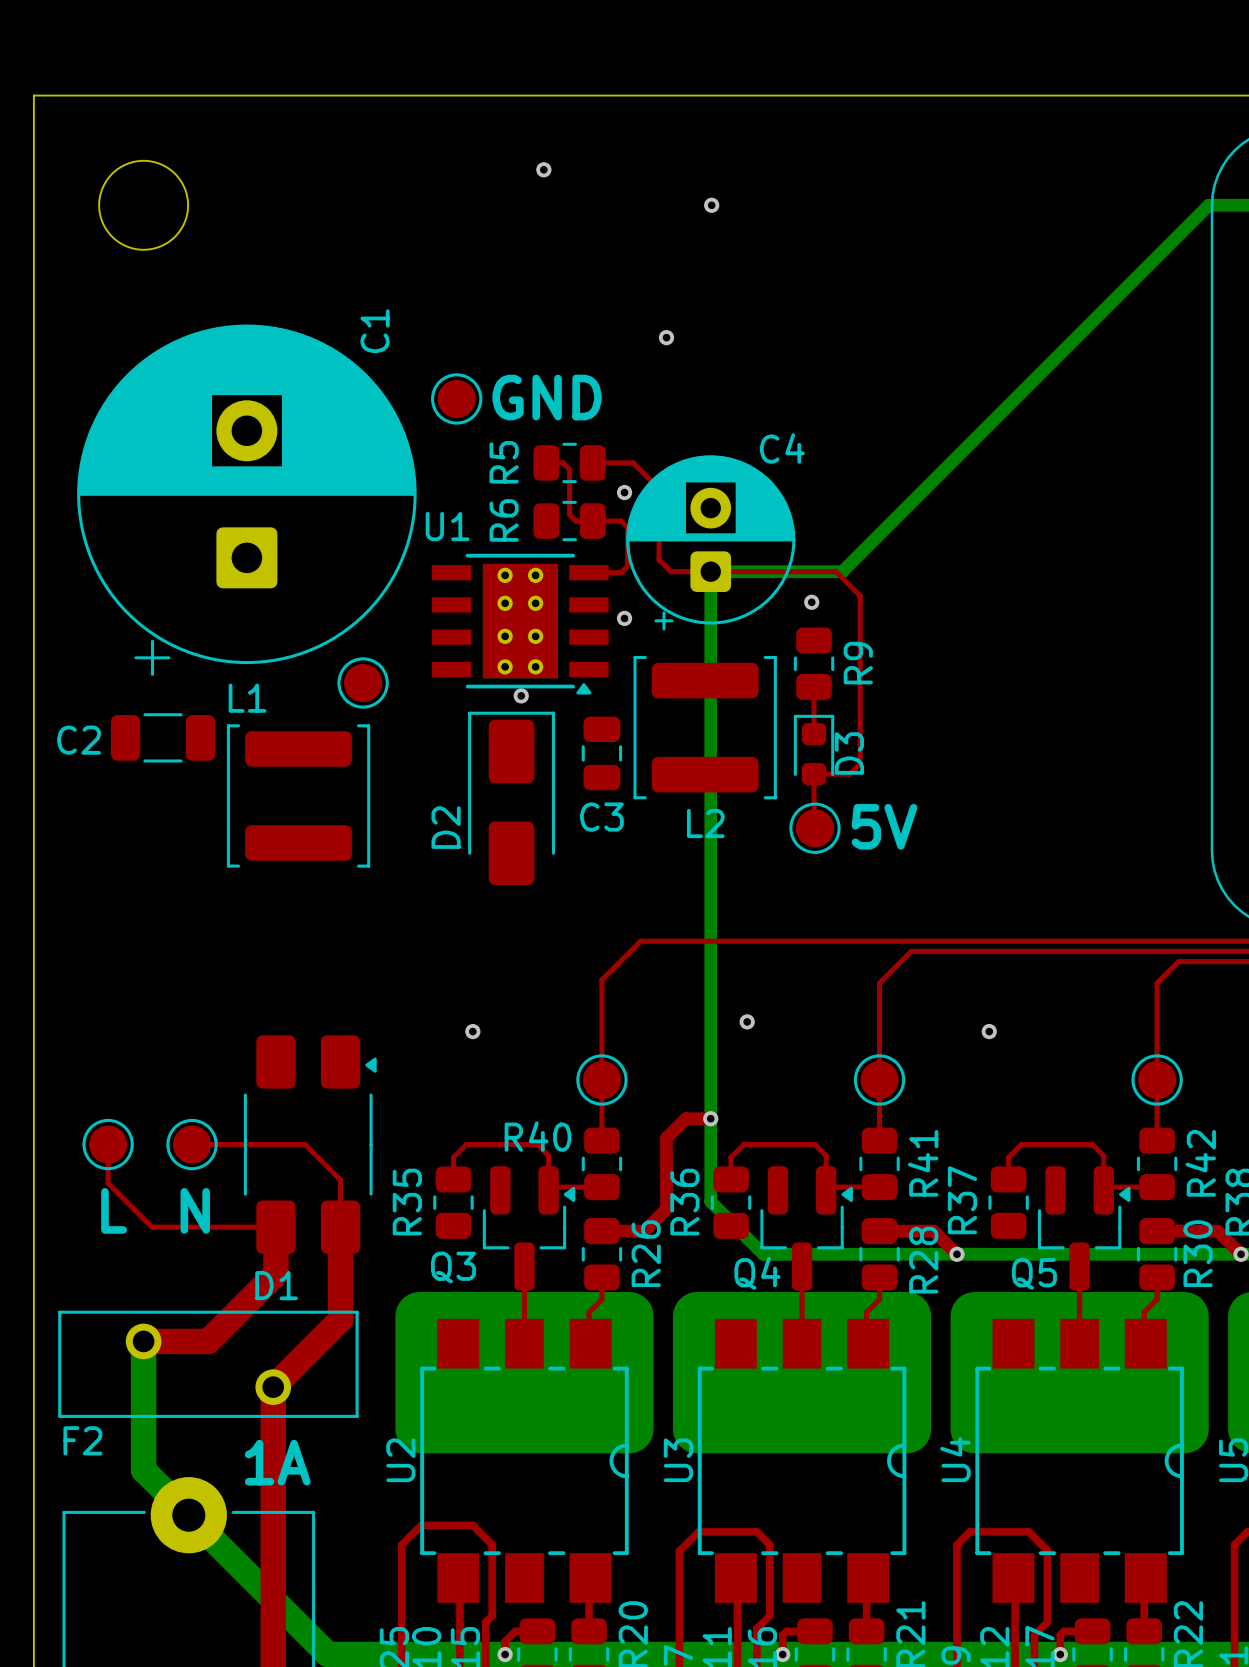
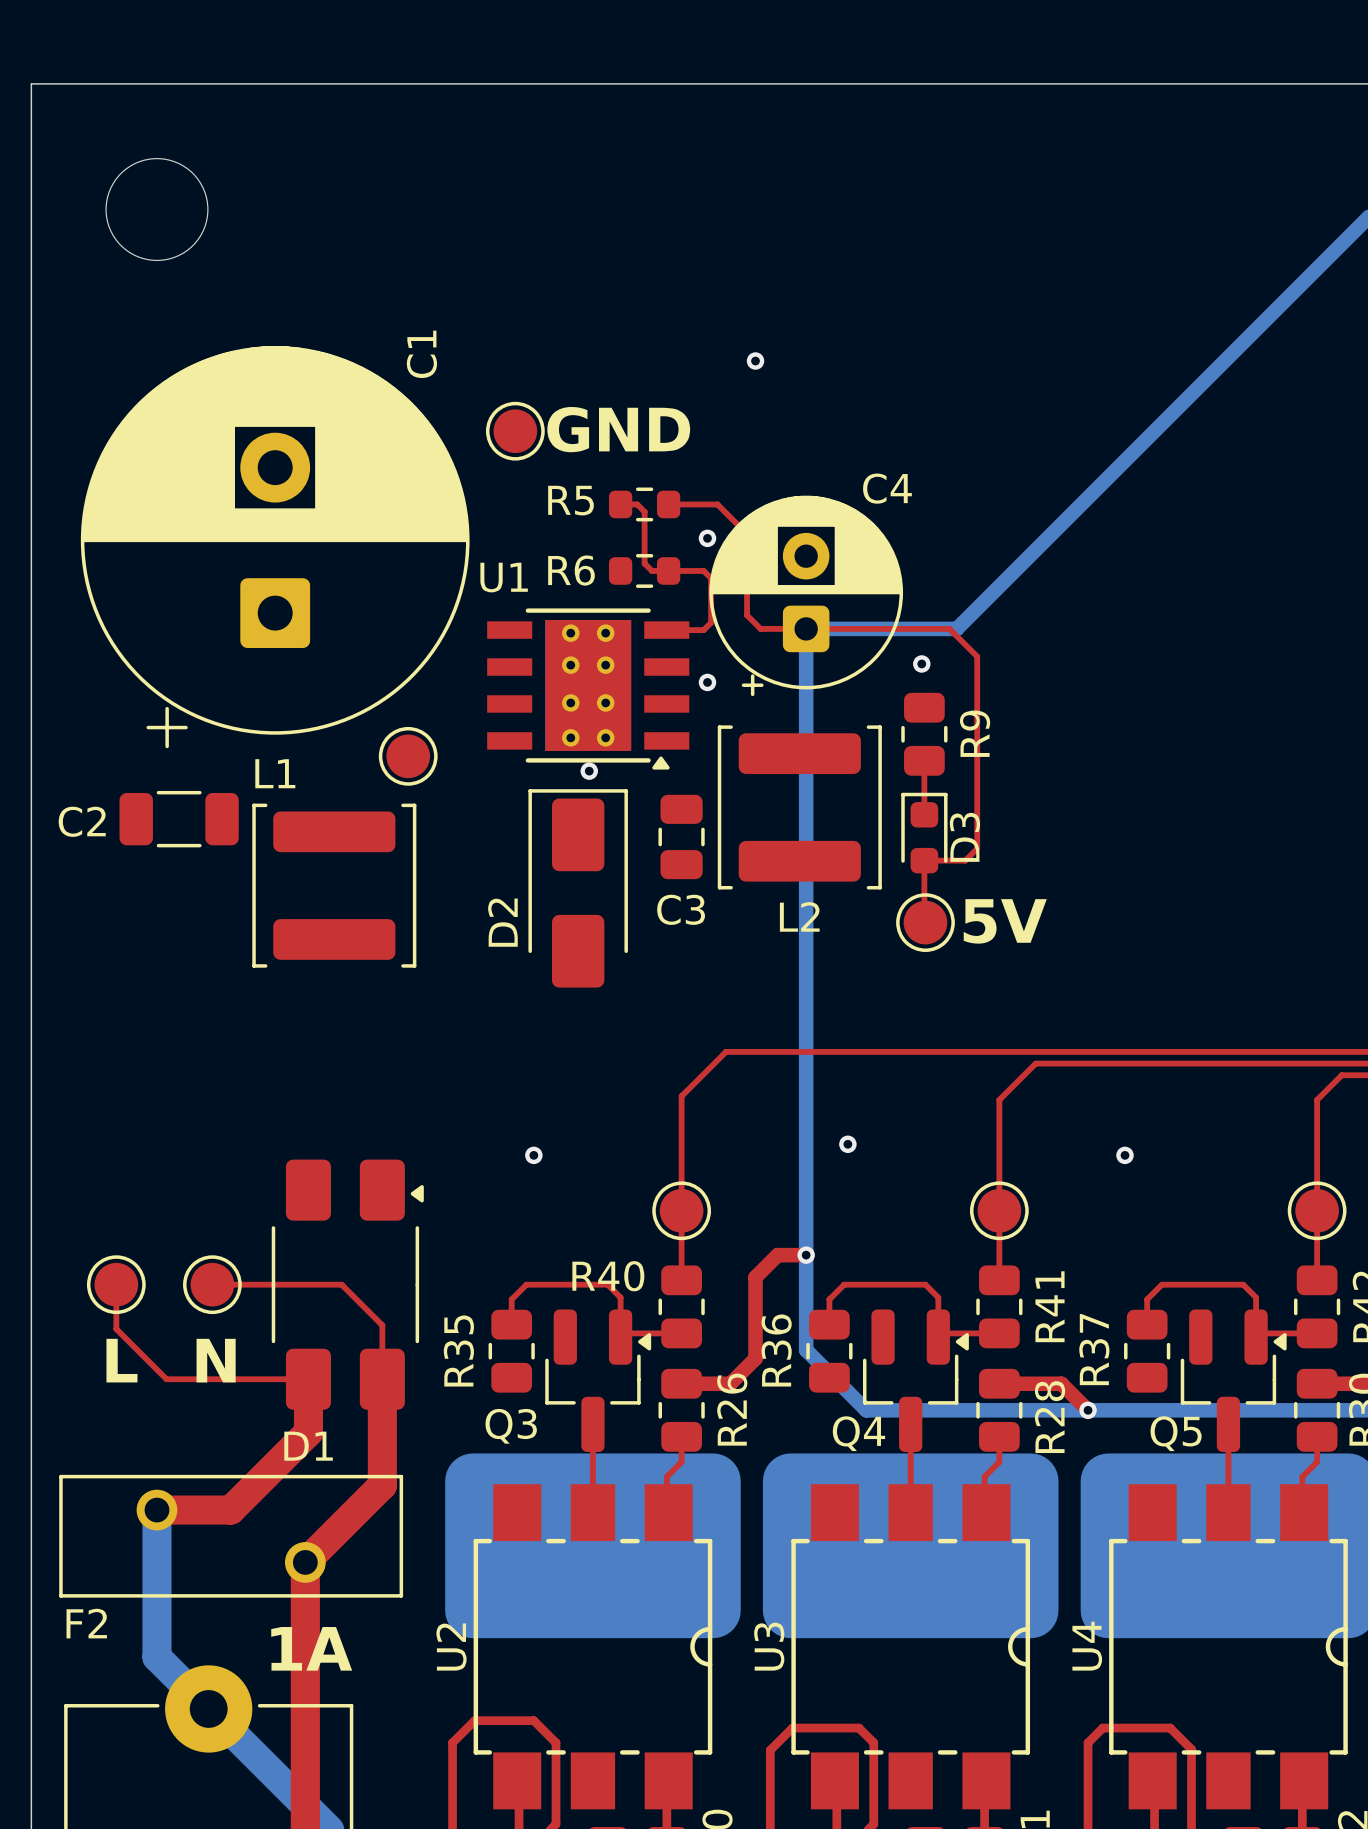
via: (543, 169) -> none
via: (711, 205) -> none
R5 footprint: [533, 442, 606, 484] -> [608, 487, 681, 522]
R5 name rotation: 0° (504, 462) -> 90° clockwise (571, 500)
R6 footprint: [533, 500, 606, 542] -> [608, 554, 681, 588]
R6 name rotation: 0° (504, 520) -> 90° clockwise (571, 570)

